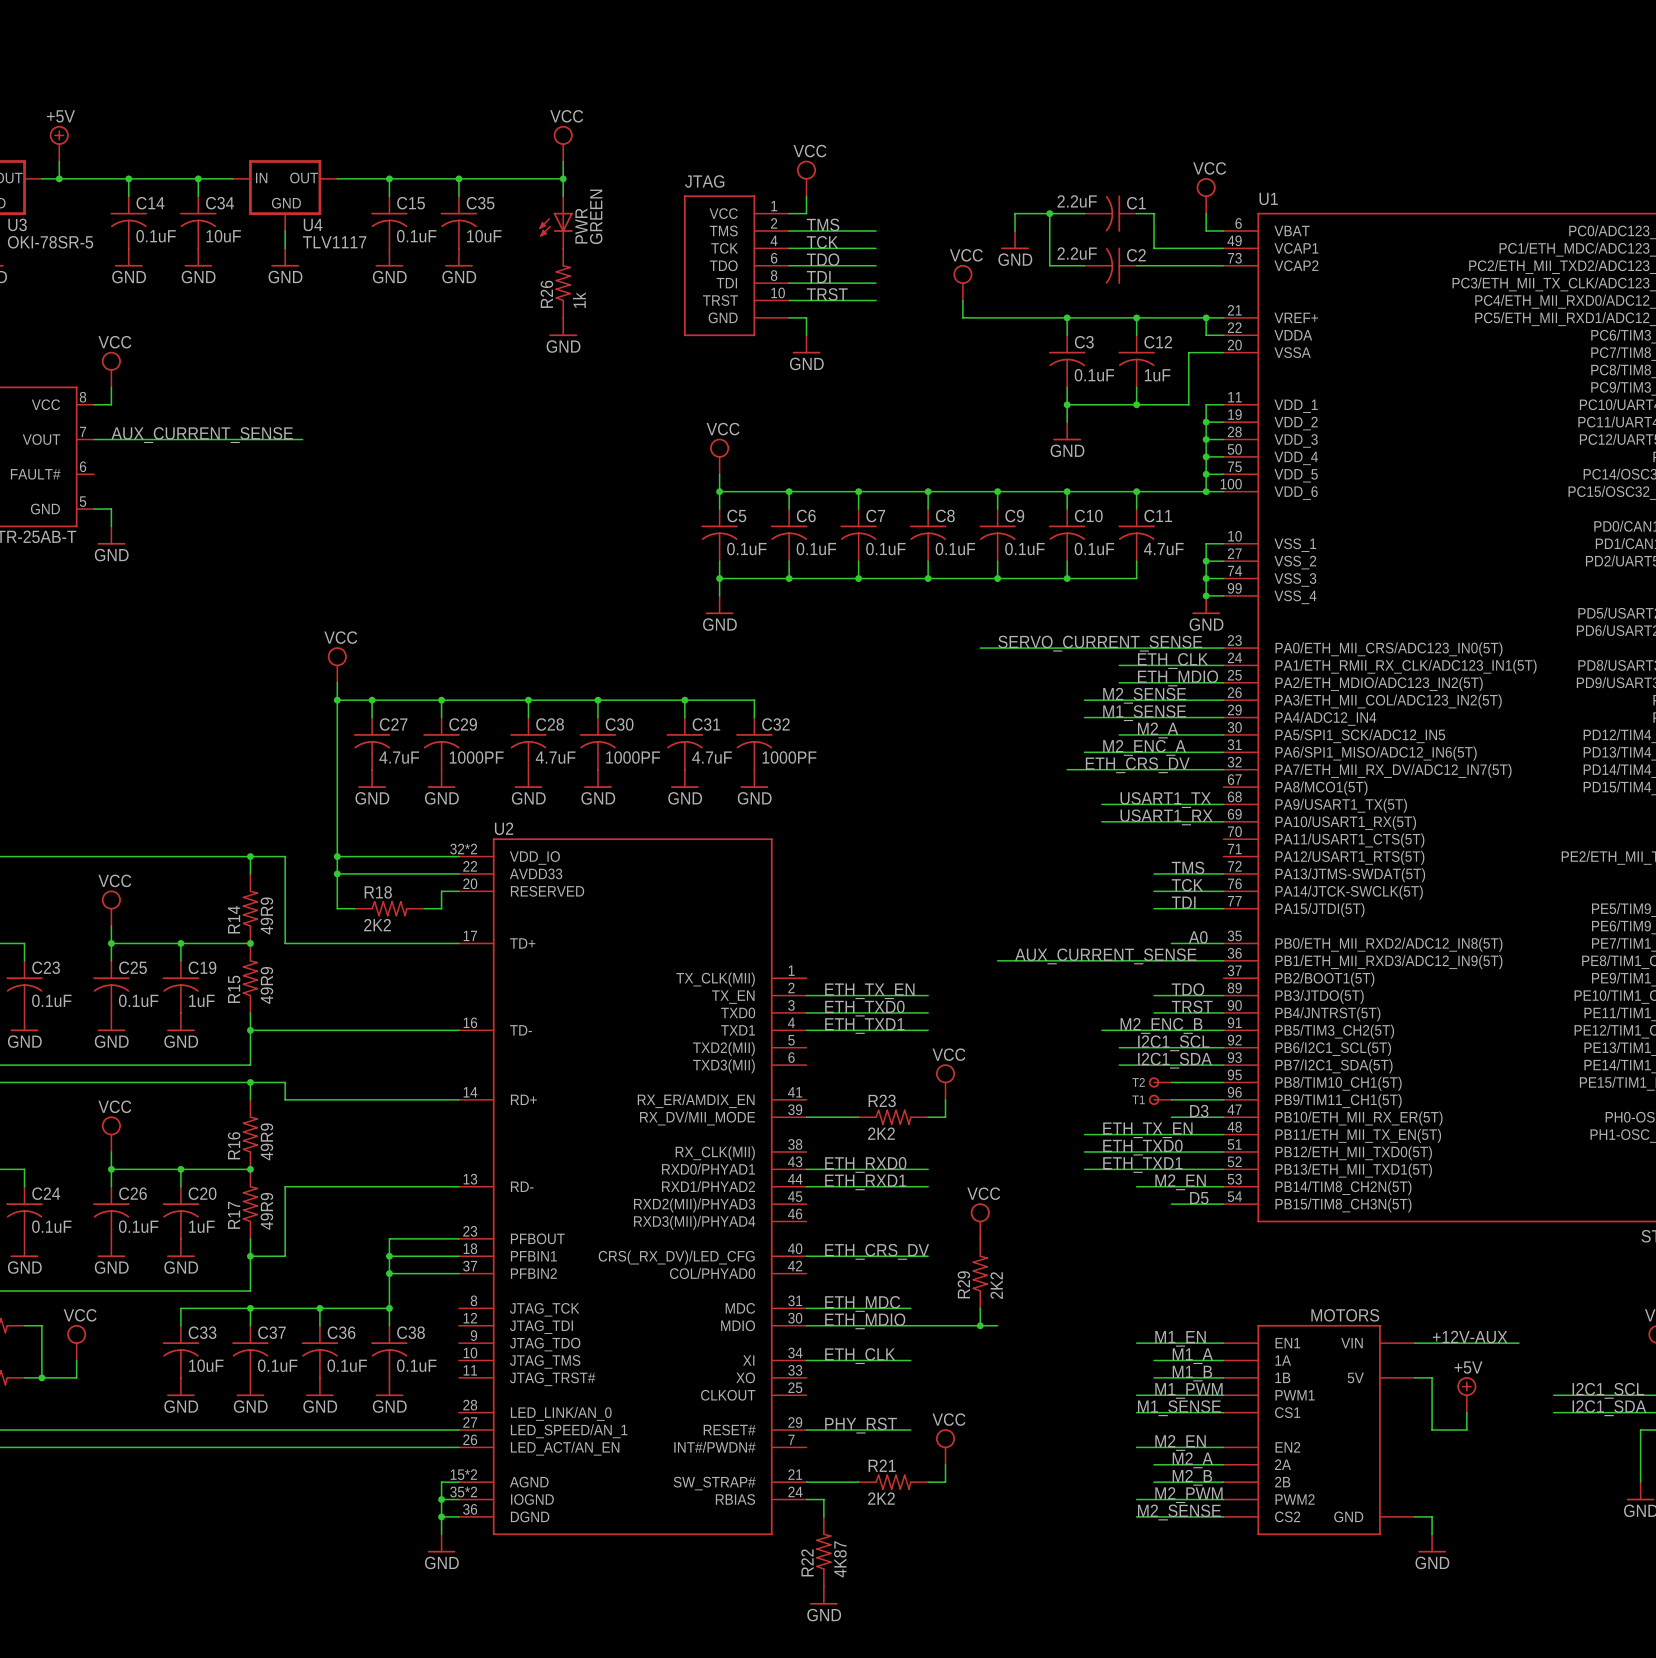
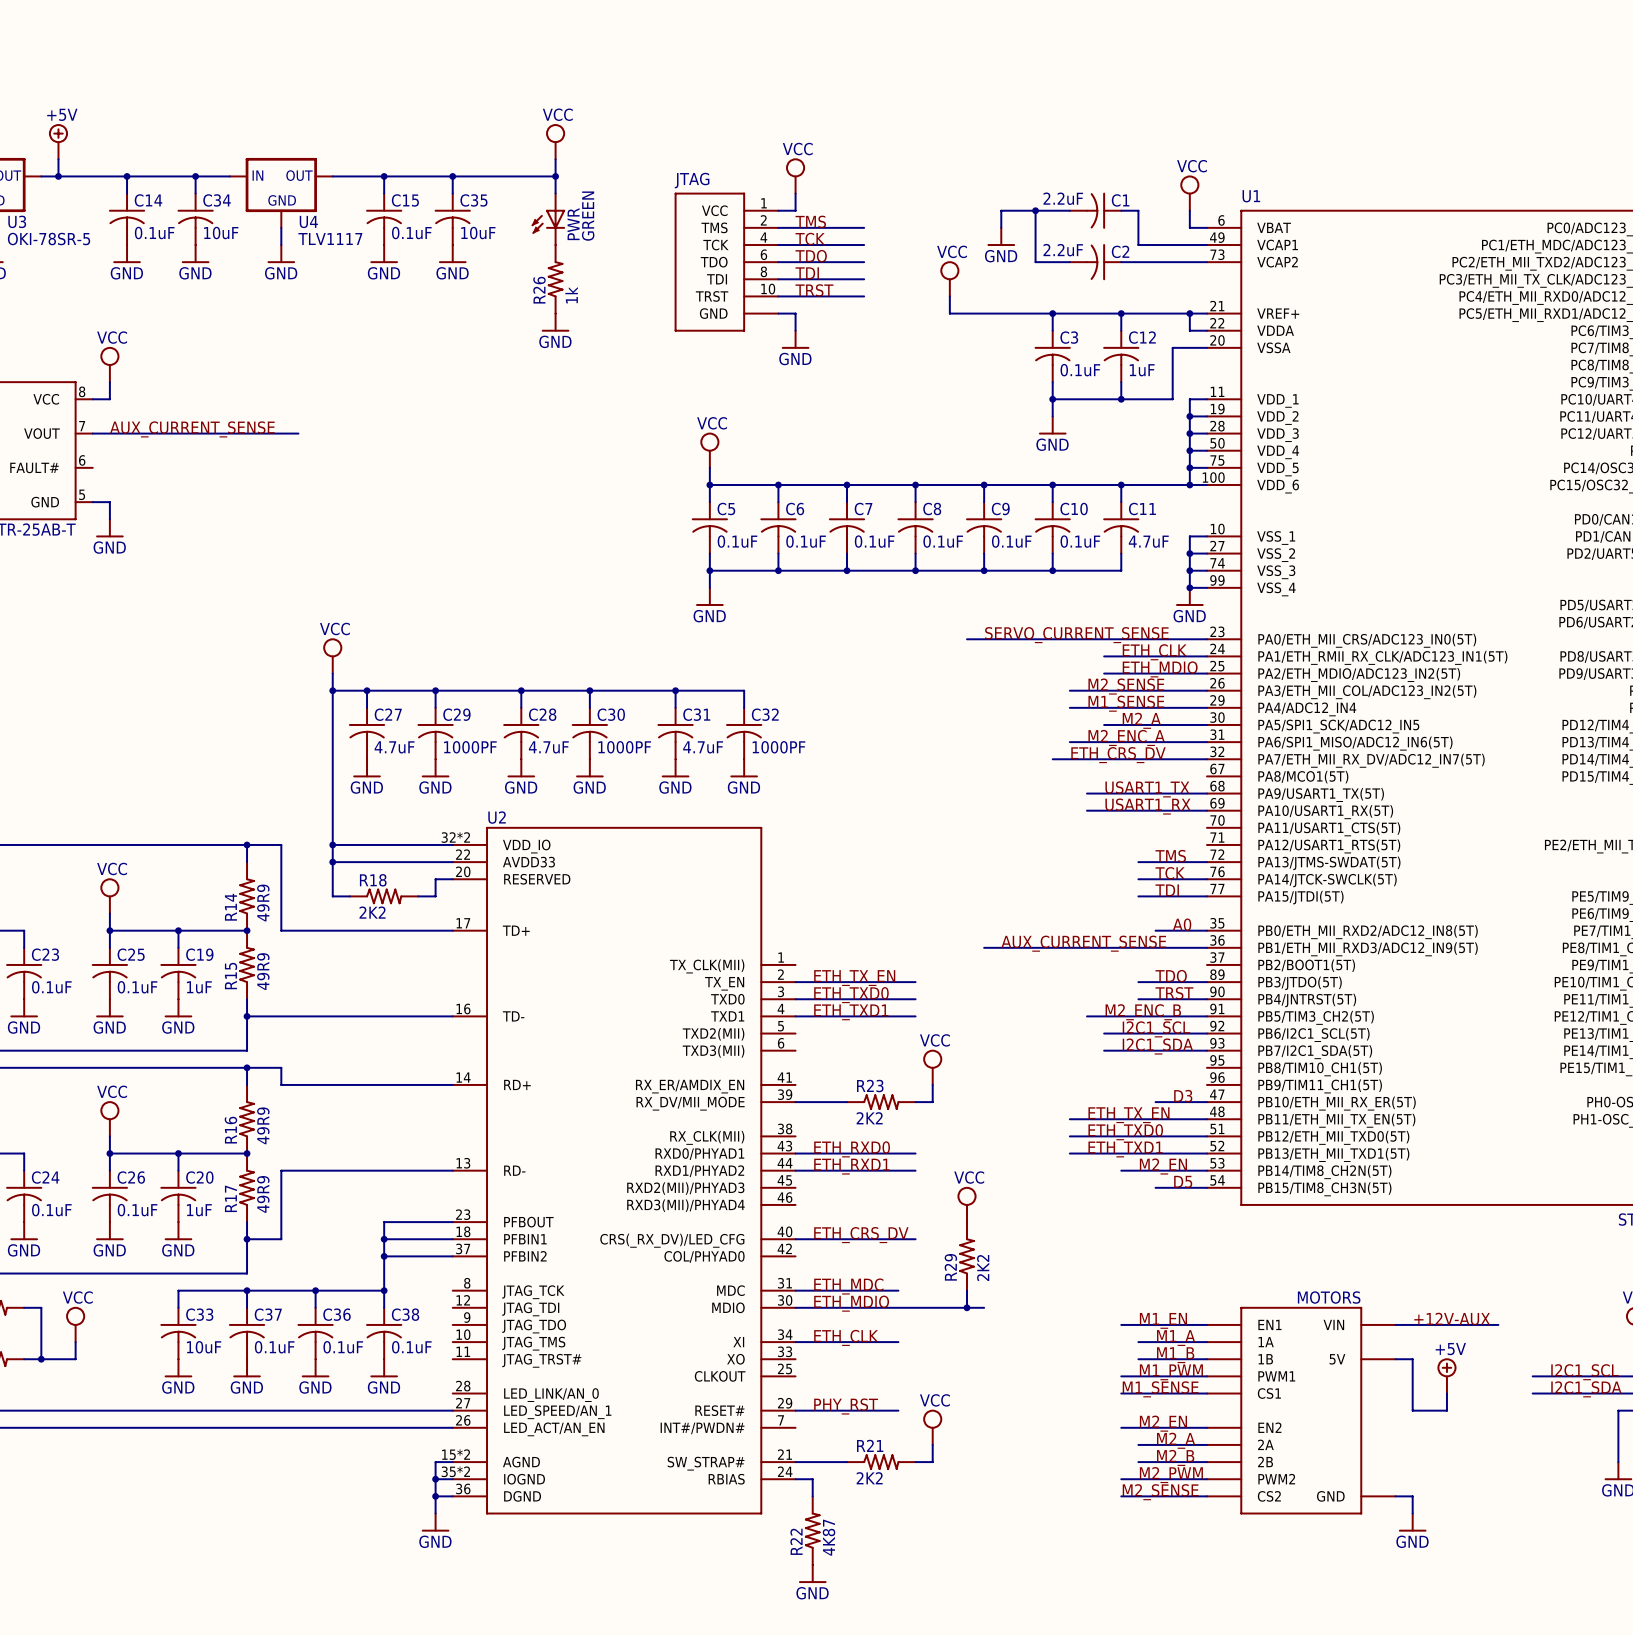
T2: (1160, 1082) -> none
wire: (1171, 1082) (1223, 1082) -> none
T1: (1160, 1099) -> none
wire: (1171, 1099) (1223, 1099) -> none

